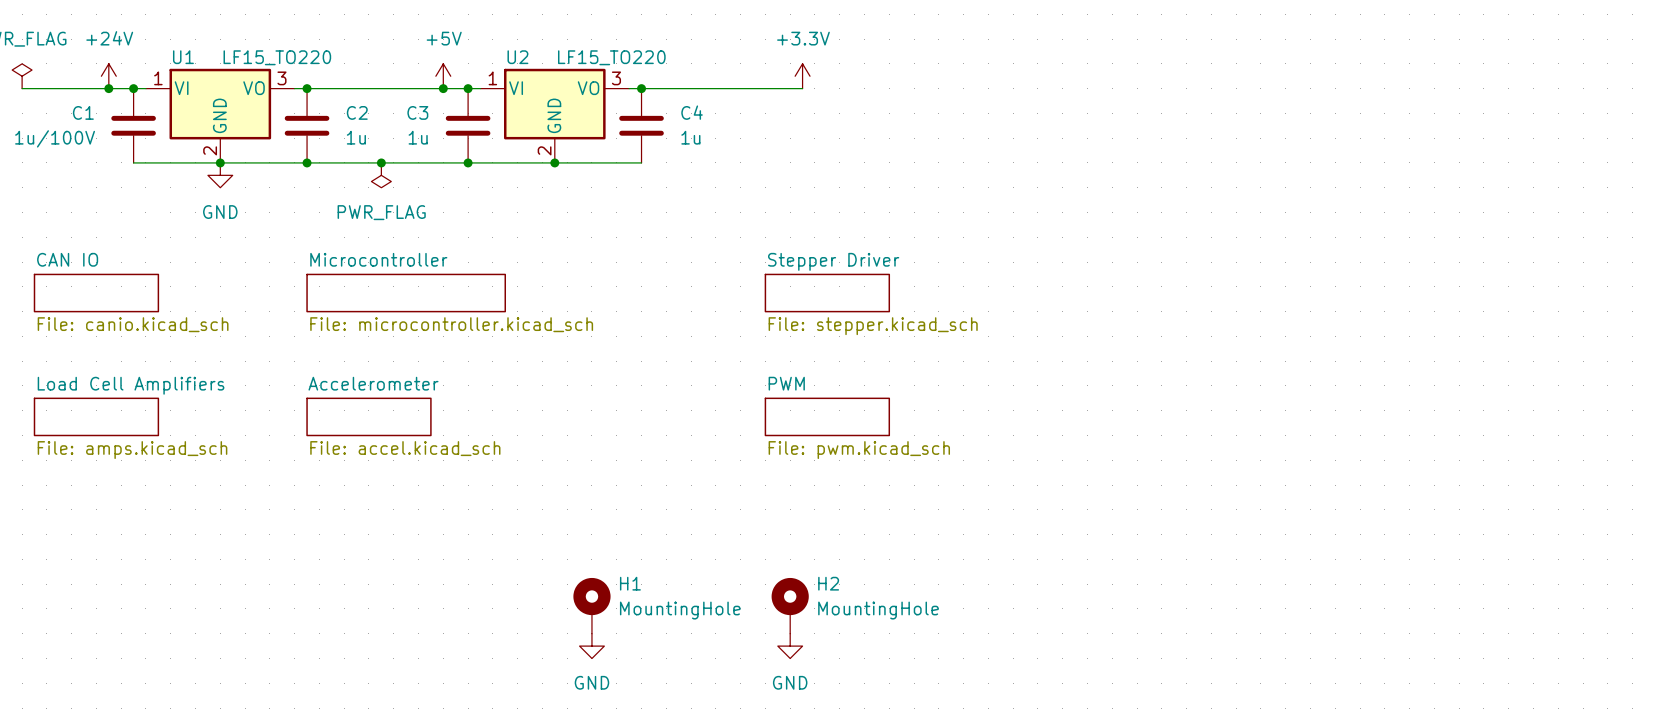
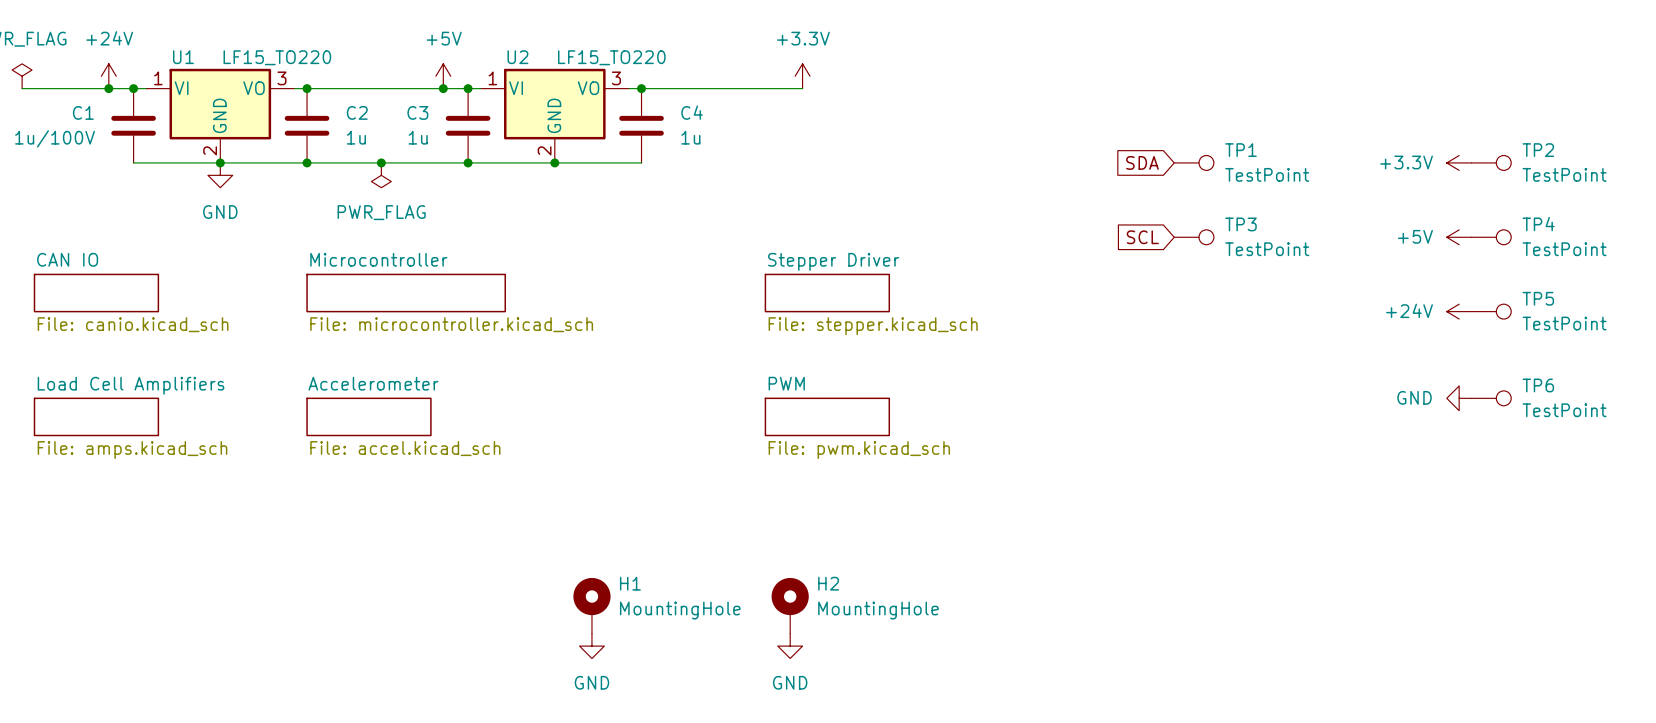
global label: none -> SDA (1142, 162)
TP1: none -> TestPoint (1194, 162)
power symbol: none -> +3.3V (1459, 162)
TP2: none -> TestPoint (1491, 162)
global label: none -> SCL (1142, 237)
TP3: none -> TestPoint (1194, 237)
power symbol: none -> +5V (1459, 237)
TP4: none -> TestPoint (1491, 237)
power symbol: none -> +24V (1459, 311)
TP5: none -> TestPoint (1491, 311)
power symbol: none -> GND (1459, 398)
TP6: none -> TestPoint (1491, 398)

